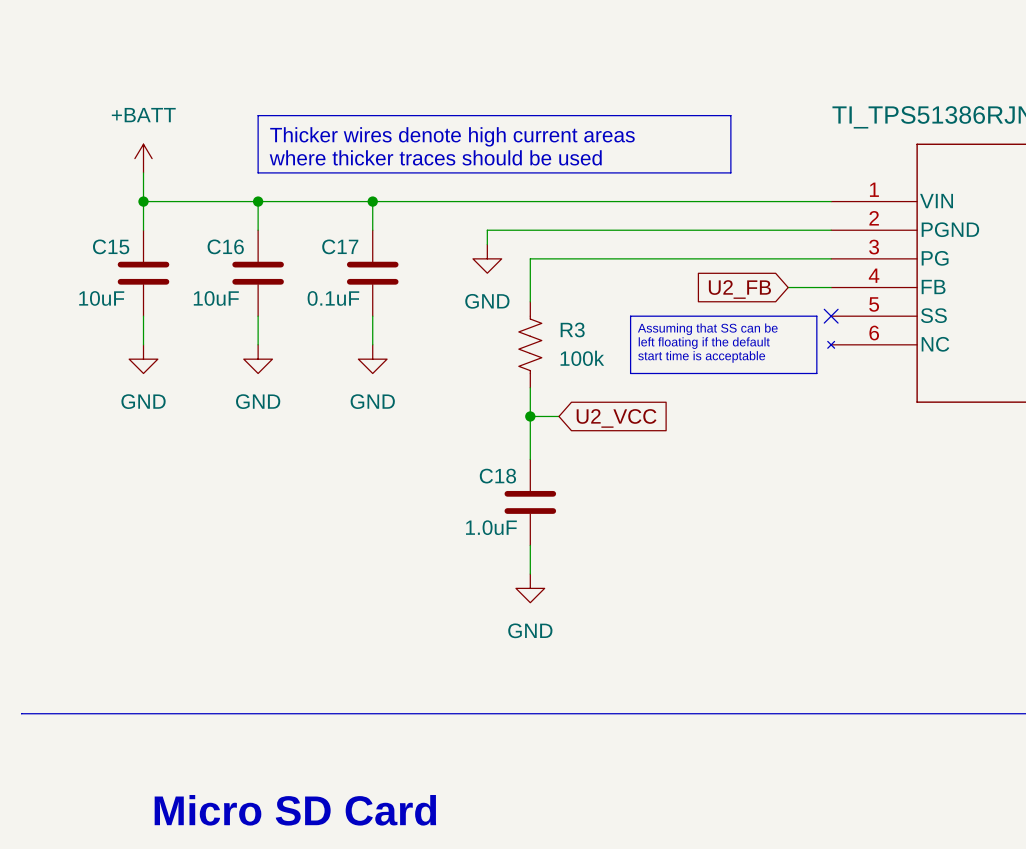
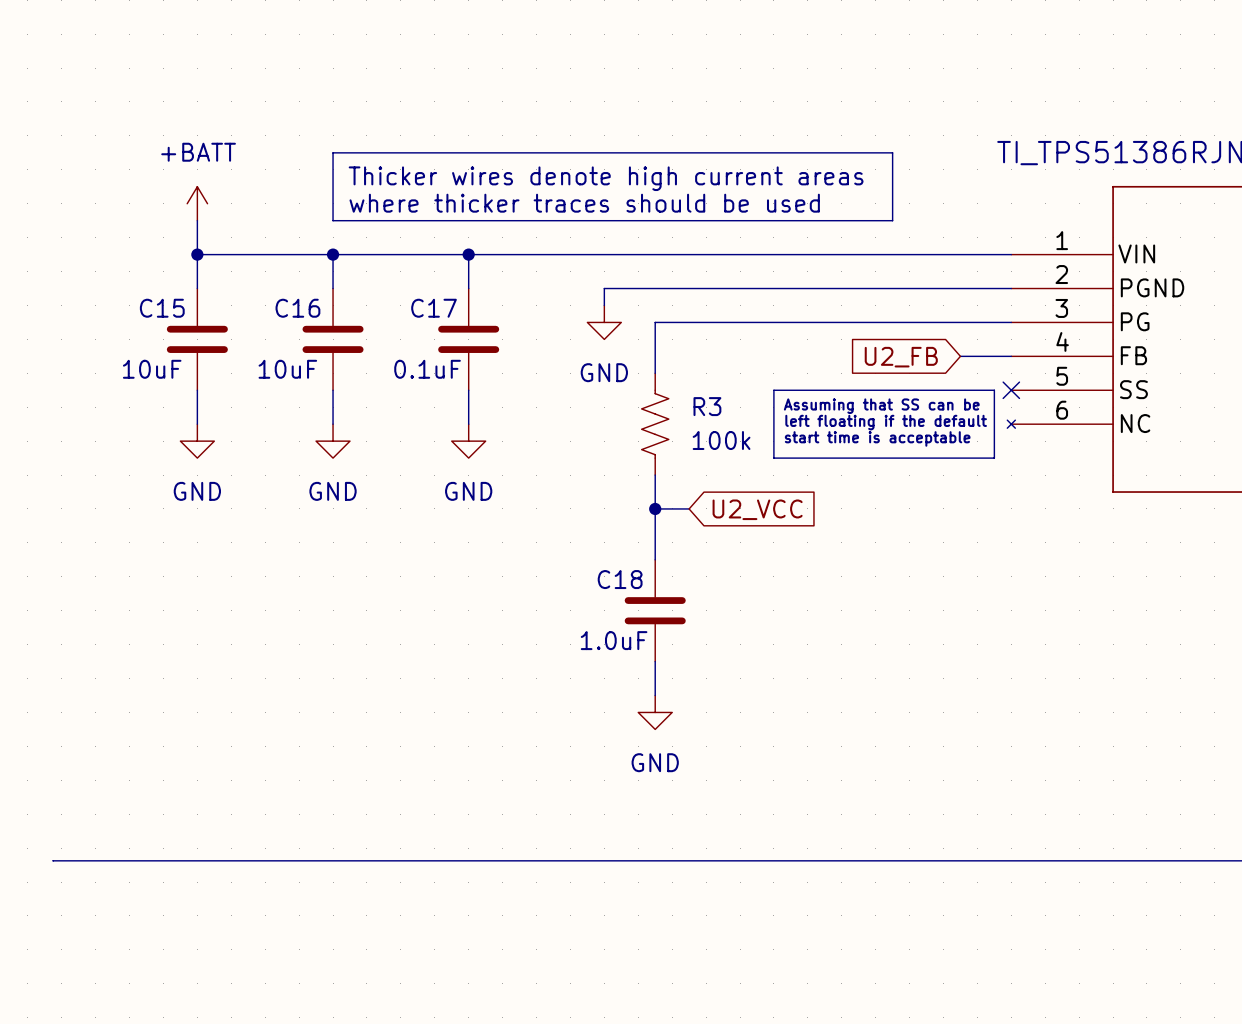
text: Micro SD Card (295, 810) -> none

